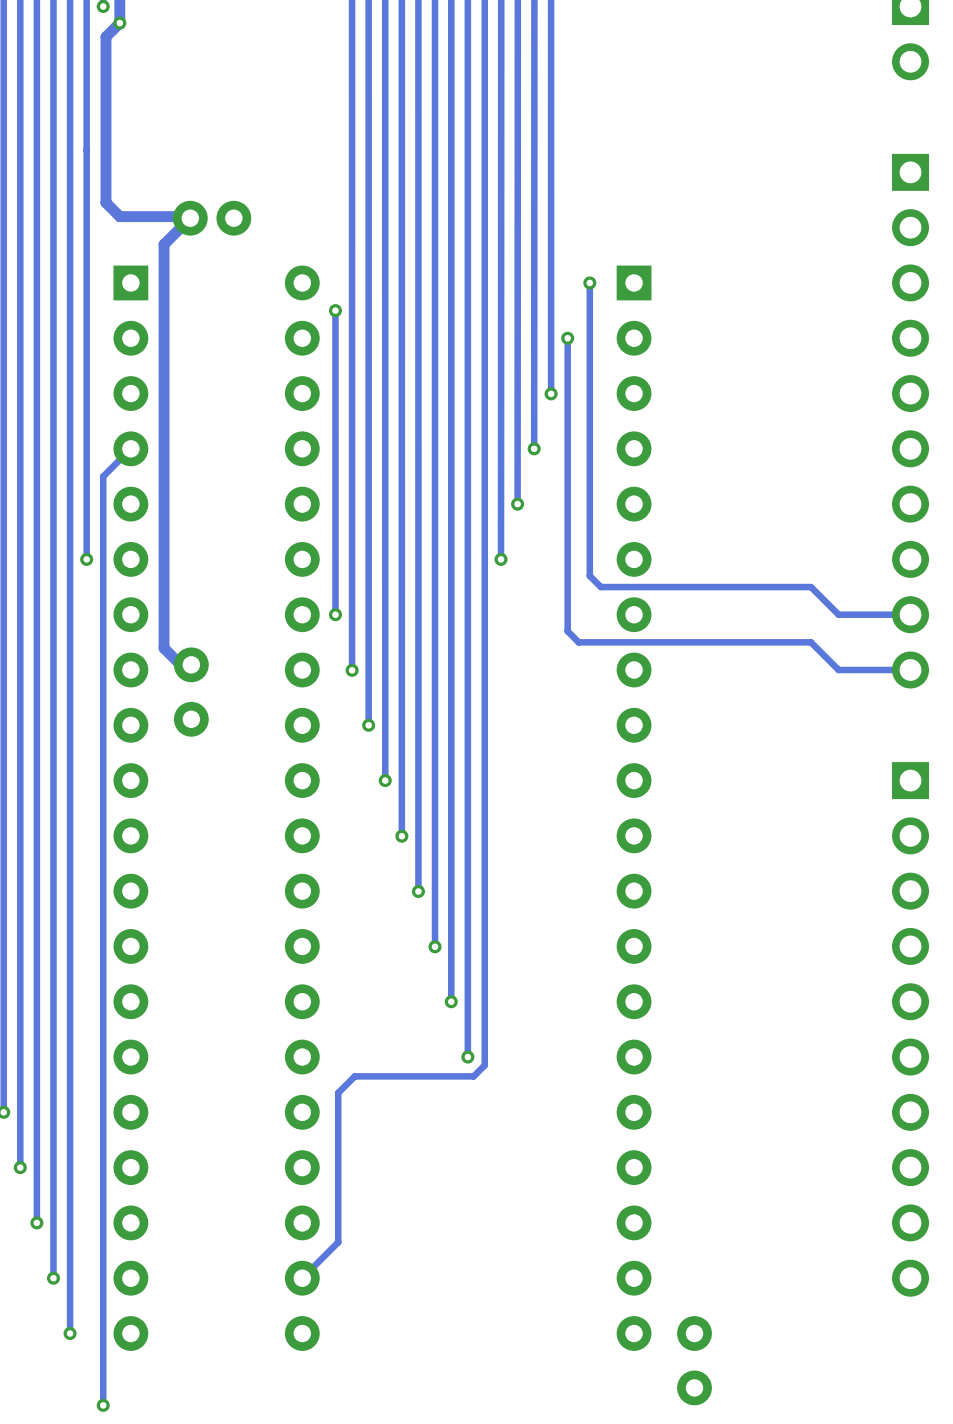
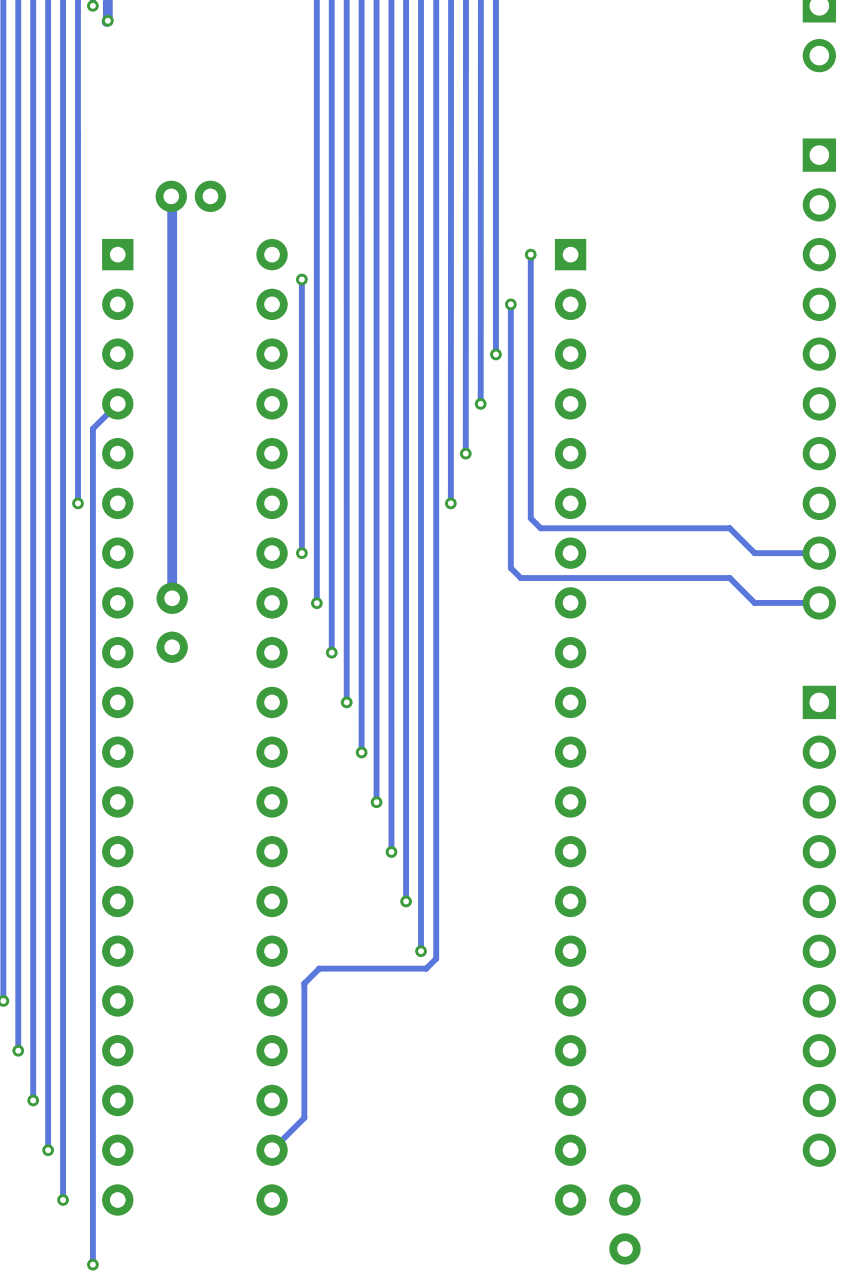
track: (118, 24) (106, 36) (106, 202) (119, 216) (188, 216) -> none
track: (190, 218) (164, 244) (164, 648) (190, 674) -> none
track: none -> (172, 197) (172, 598)

